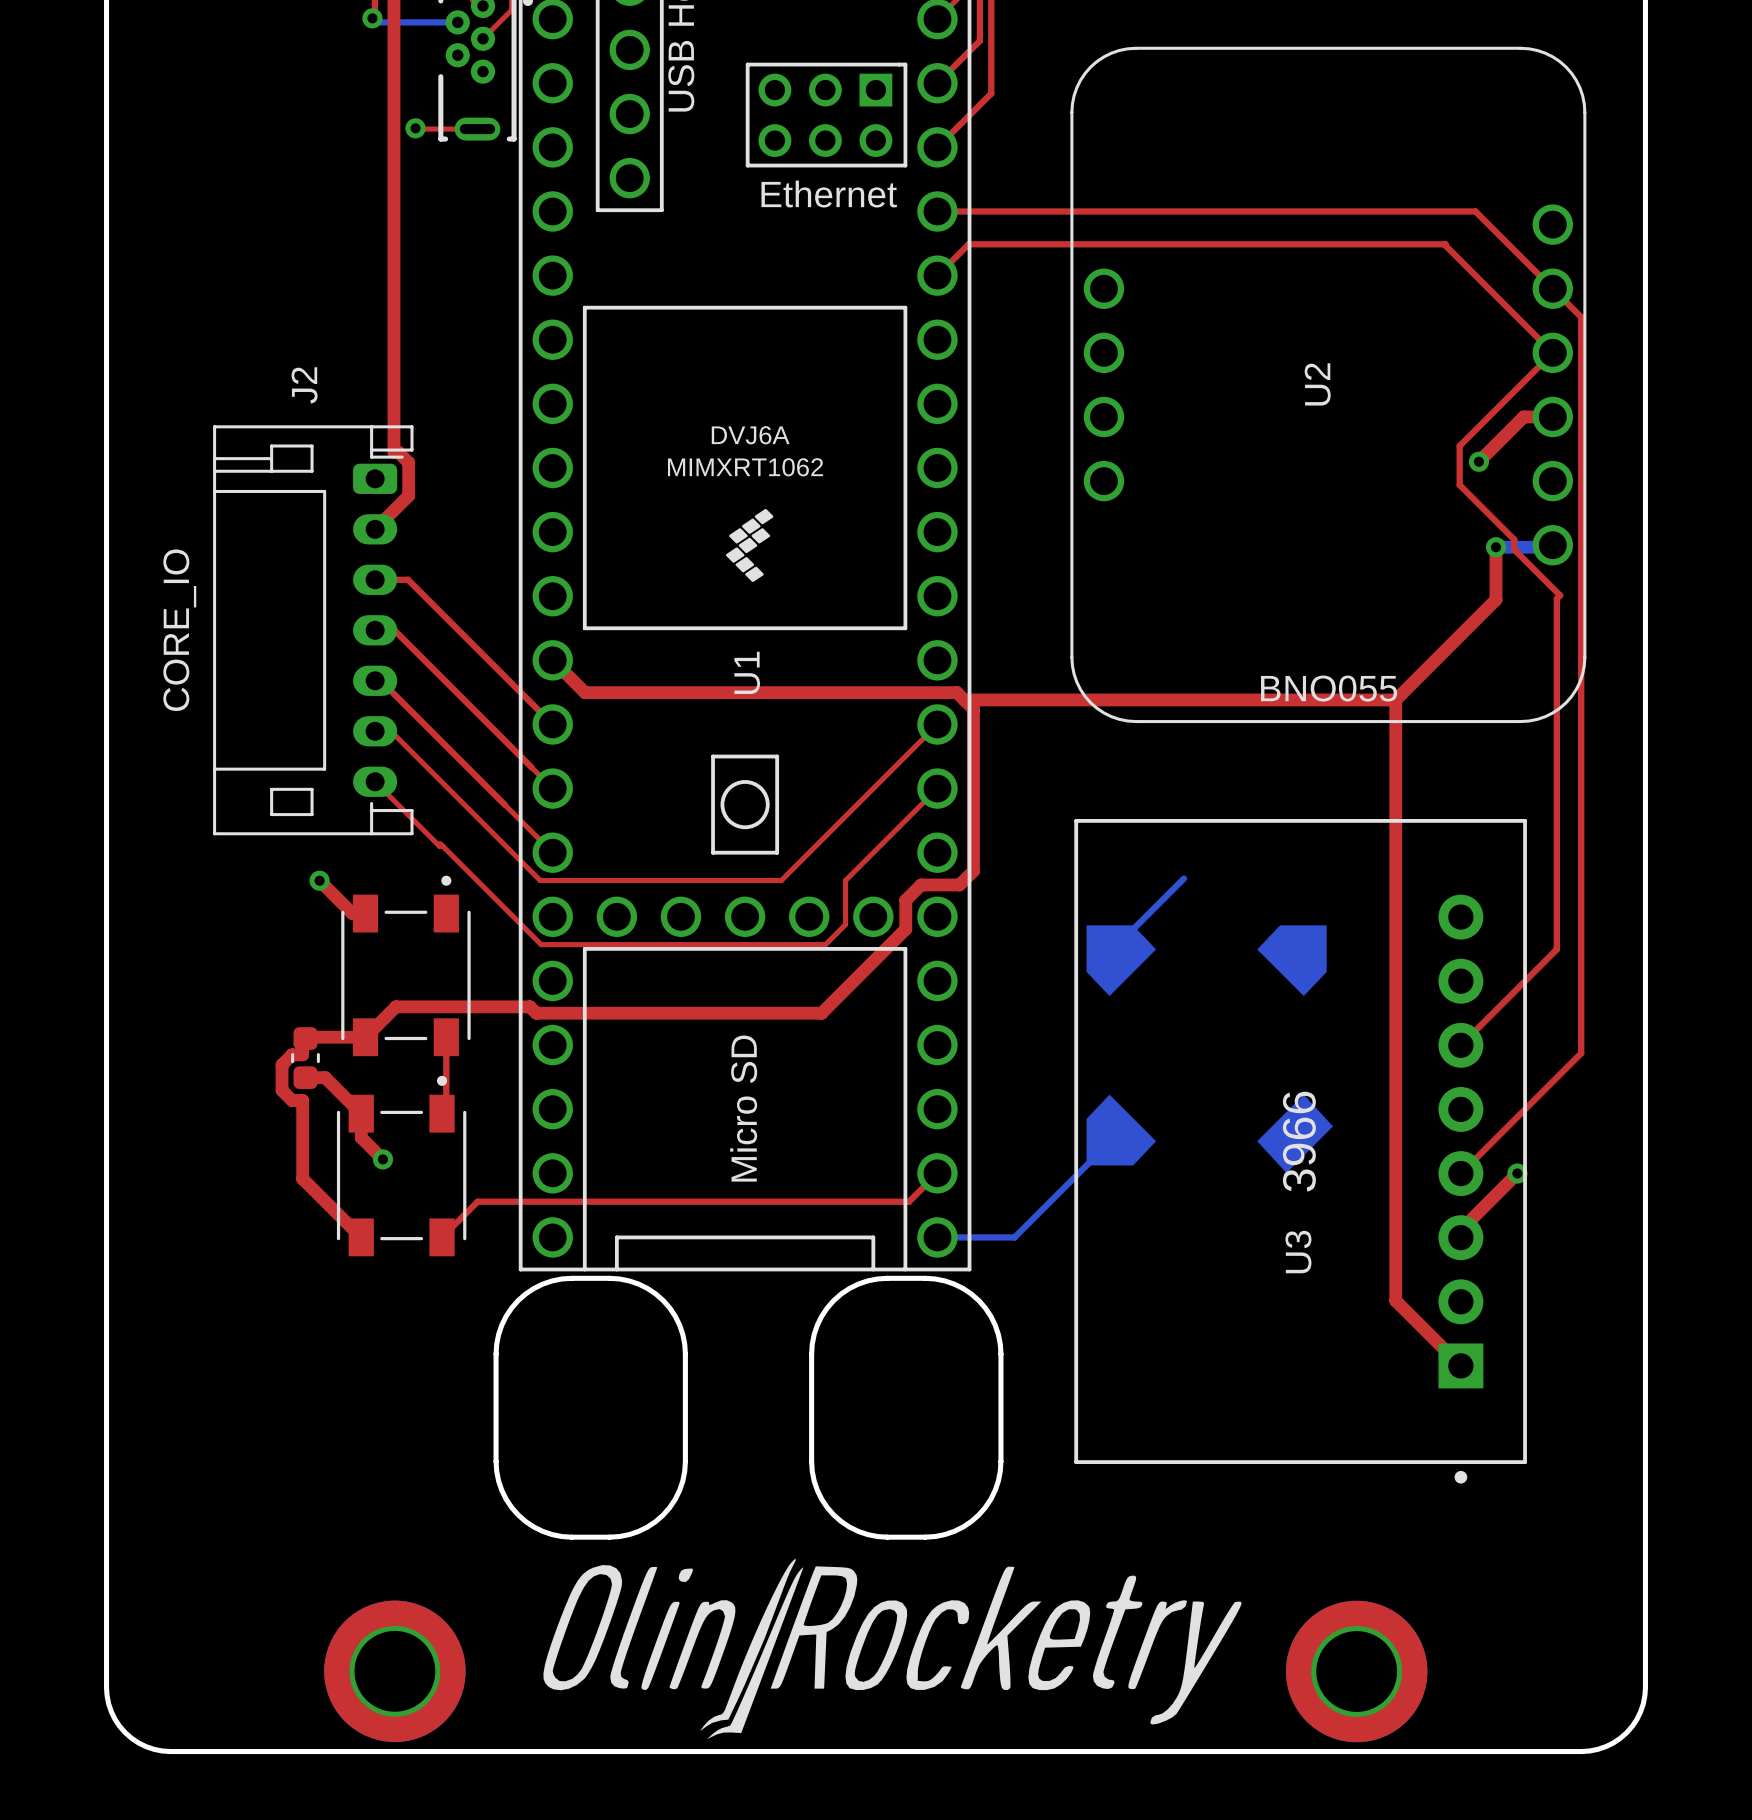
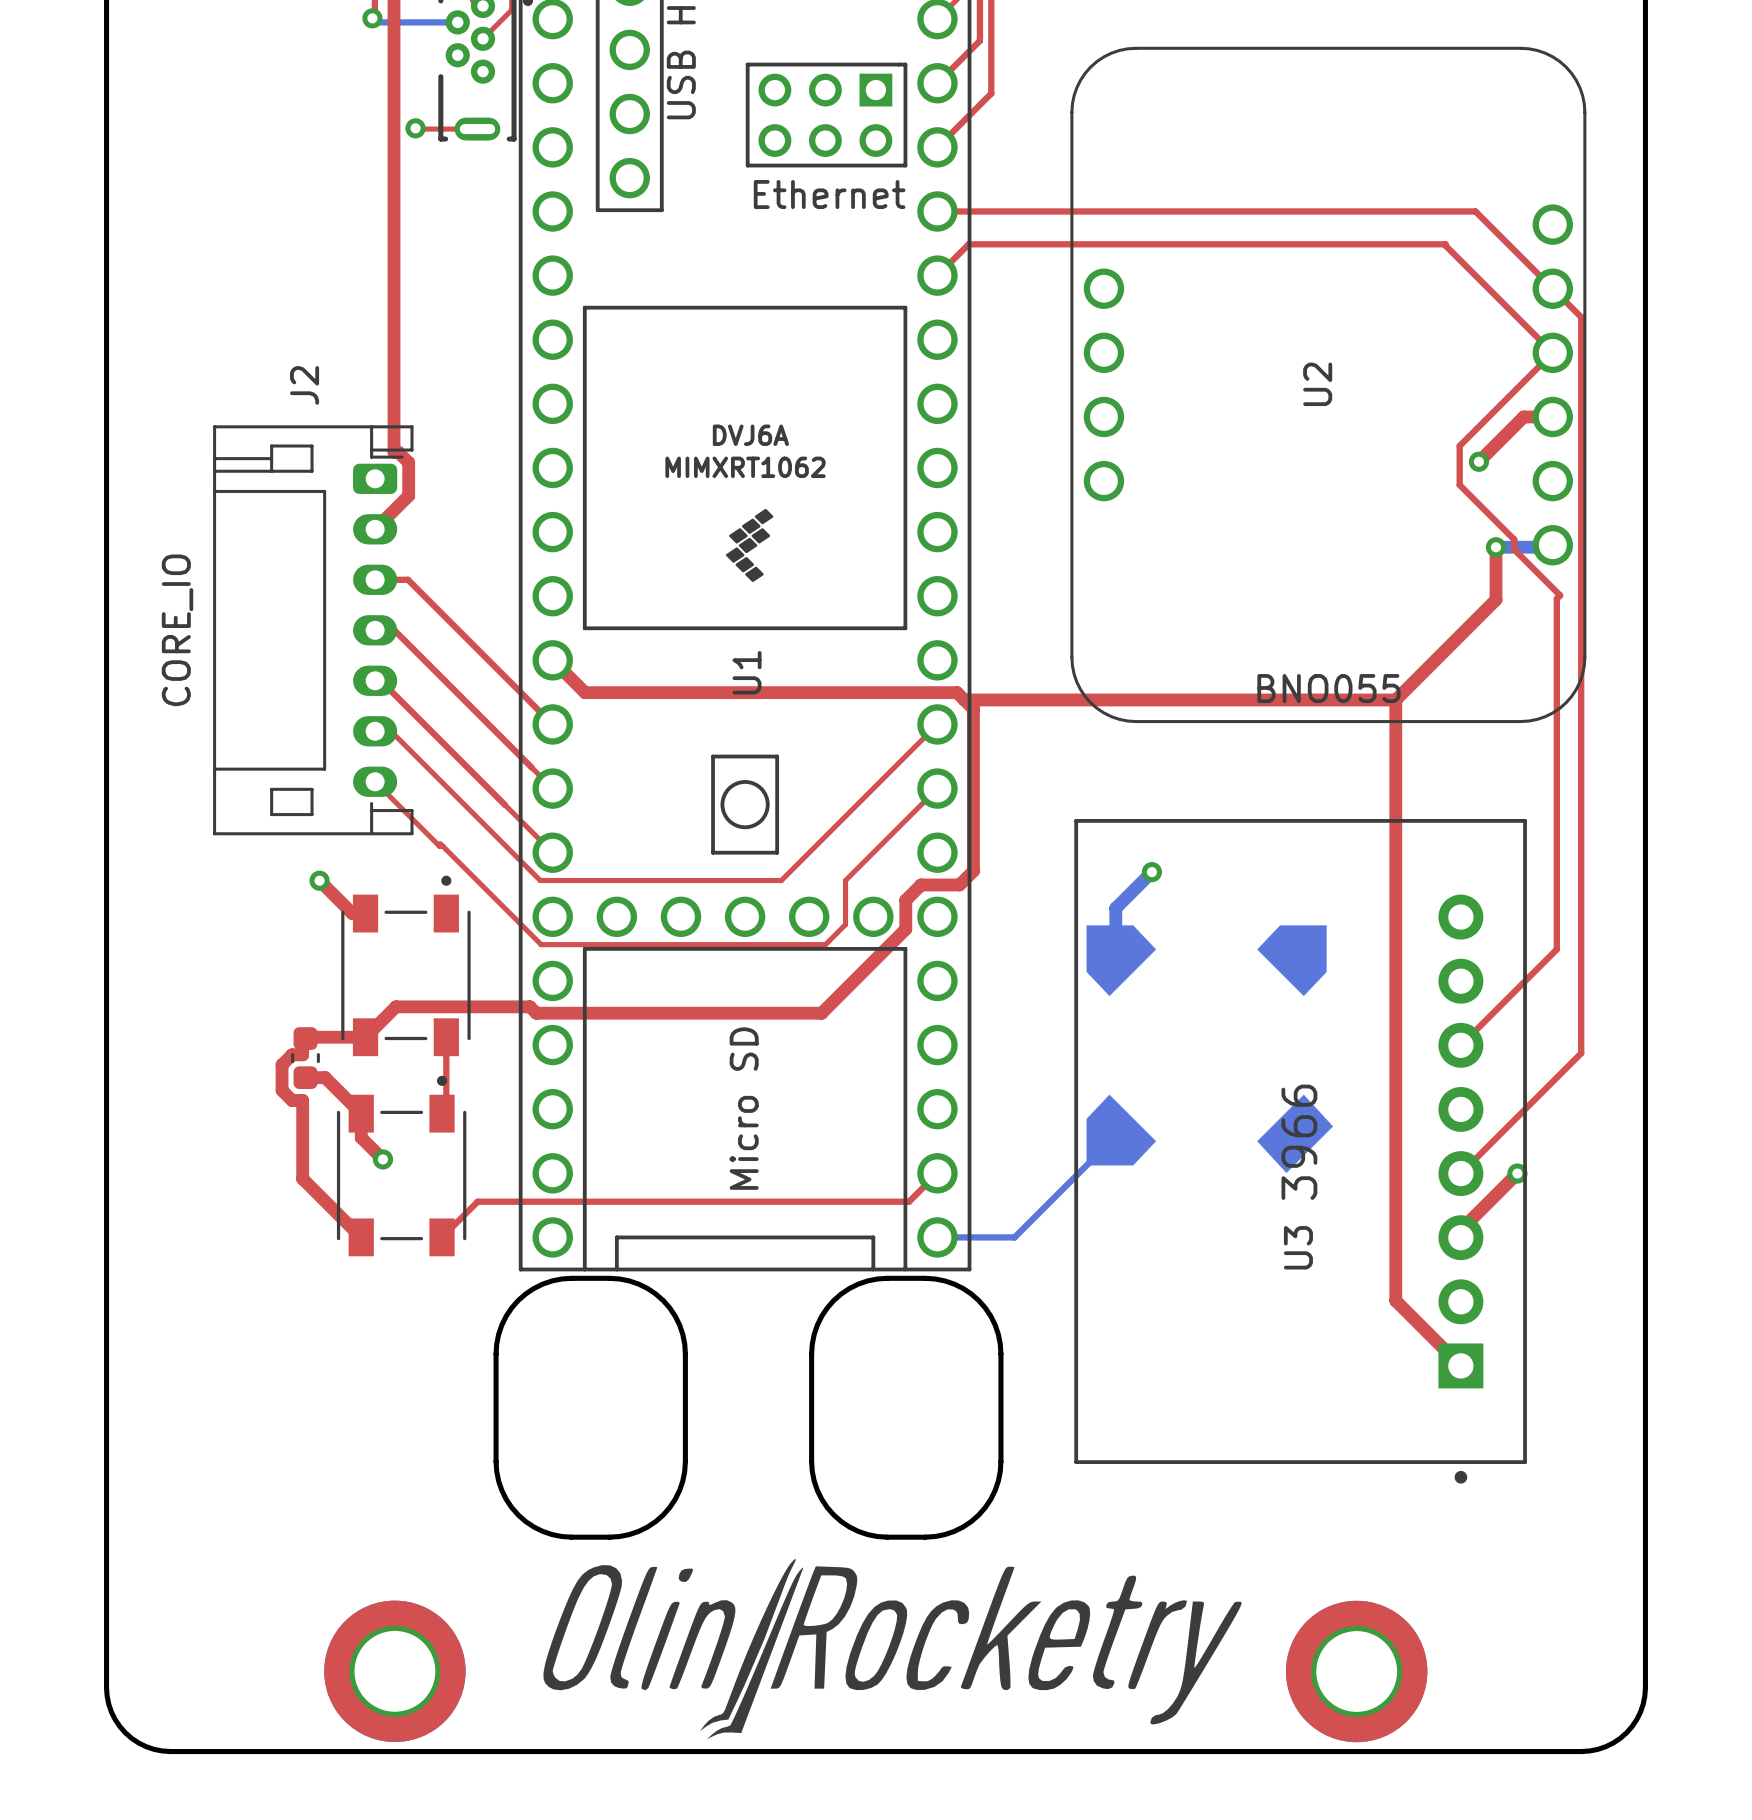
via: none -> (1151, 872)
bottom track: (1183, 878) (1115, 946) -> (1151, 872) (1115, 908) (1115, 946)

